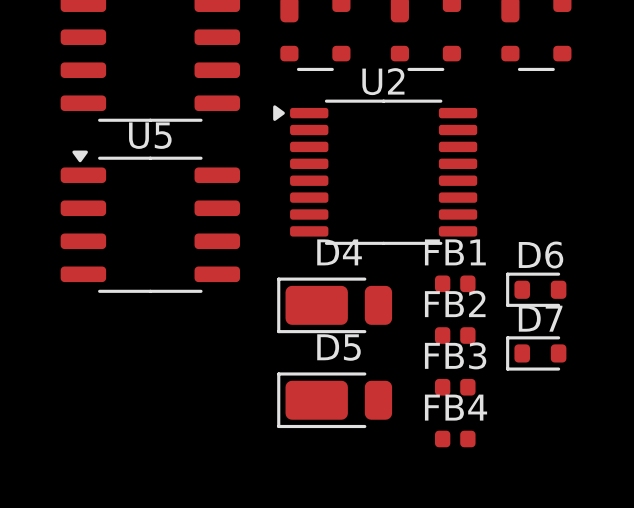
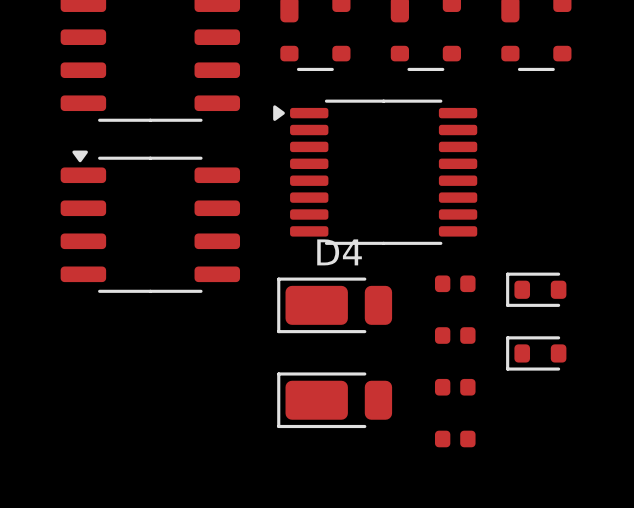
U2 name: U2 (383, 81) -> none
U5 name: U5 (150, 135) -> none
FB1 name: FB1 (455, 252) -> none
D6 name: D6 (541, 255) -> none
FB2 name: FB2 (455, 303) -> none
D7 name: D7 (540, 318) -> none
D5 name: D5 (338, 347) -> none
FB3 name: FB3 (455, 355) -> none
FB4 name: FB4 (456, 407) -> none

